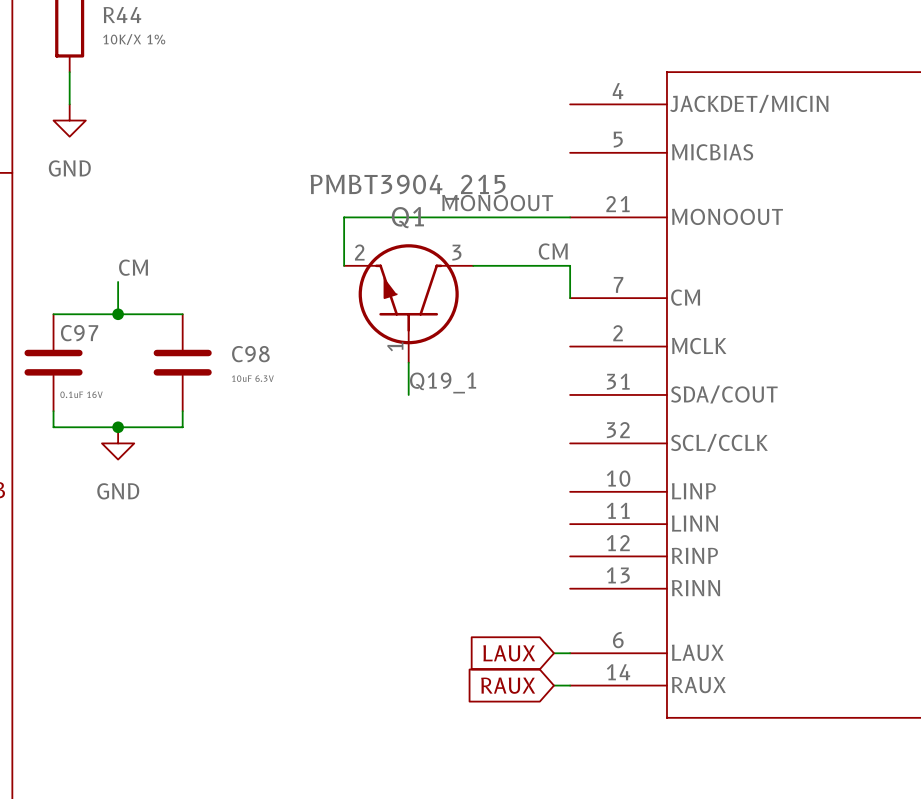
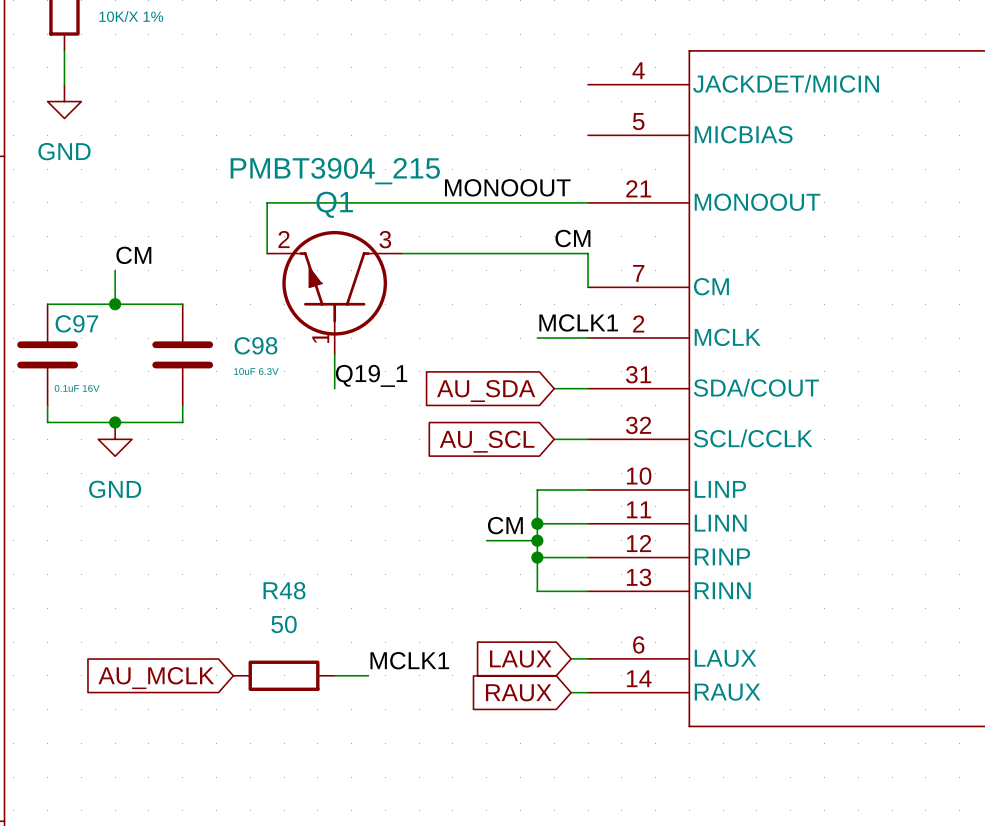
wire: (344, 217) (344, 265) -> (351, 202) (267, 202) (267, 253)
wire: none -> (402, 253) (486, 253)
Q1 position: (408, 303) -> (334, 292)
label: none -> MCLK1 (578, 322)
wire: none -> (537, 338) (588, 338)
wire: (408, 362) (408, 394) -> (334, 354) (334, 388)
label position: Q19_1 (443, 382) -> Q19_1 (371, 375)
wire: none -> (554, 388) (588, 388)
global label: none -> AU_SDA (486, 390)
wire: none -> (554, 439) (588, 439)
global label: none -> AU_SCL (487, 441)
wire: none -> (588, 490) (537, 490) (537, 591) (588, 591)
wire: none -> (537, 523) (588, 523)
junction: none -> (537, 523)
label: none -> CM (505, 525)
wire: none -> (486, 540) (537, 540)
junction: none -> (537, 540)
wire: none -> (537, 557) (588, 557)
junction: none -> (537, 557)
label: none -> MCLK1 (409, 660)
R48: none -> 50 (284, 675)
wire: none -> (334, 675) (368, 675)
global label: none -> AU_MCLK (156, 678)

